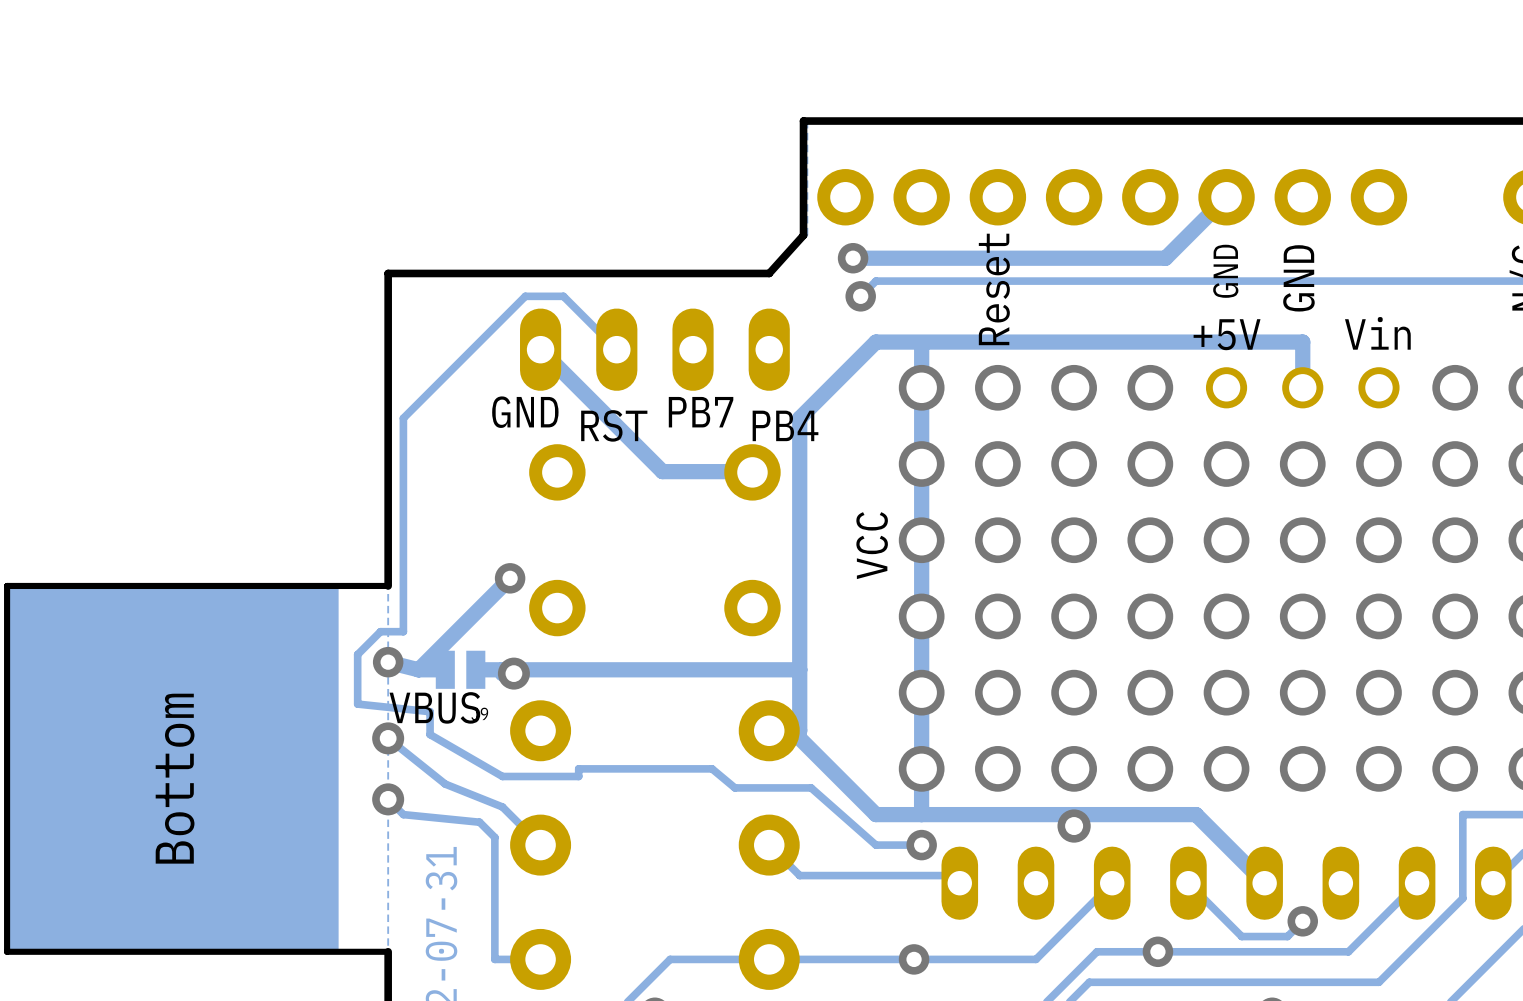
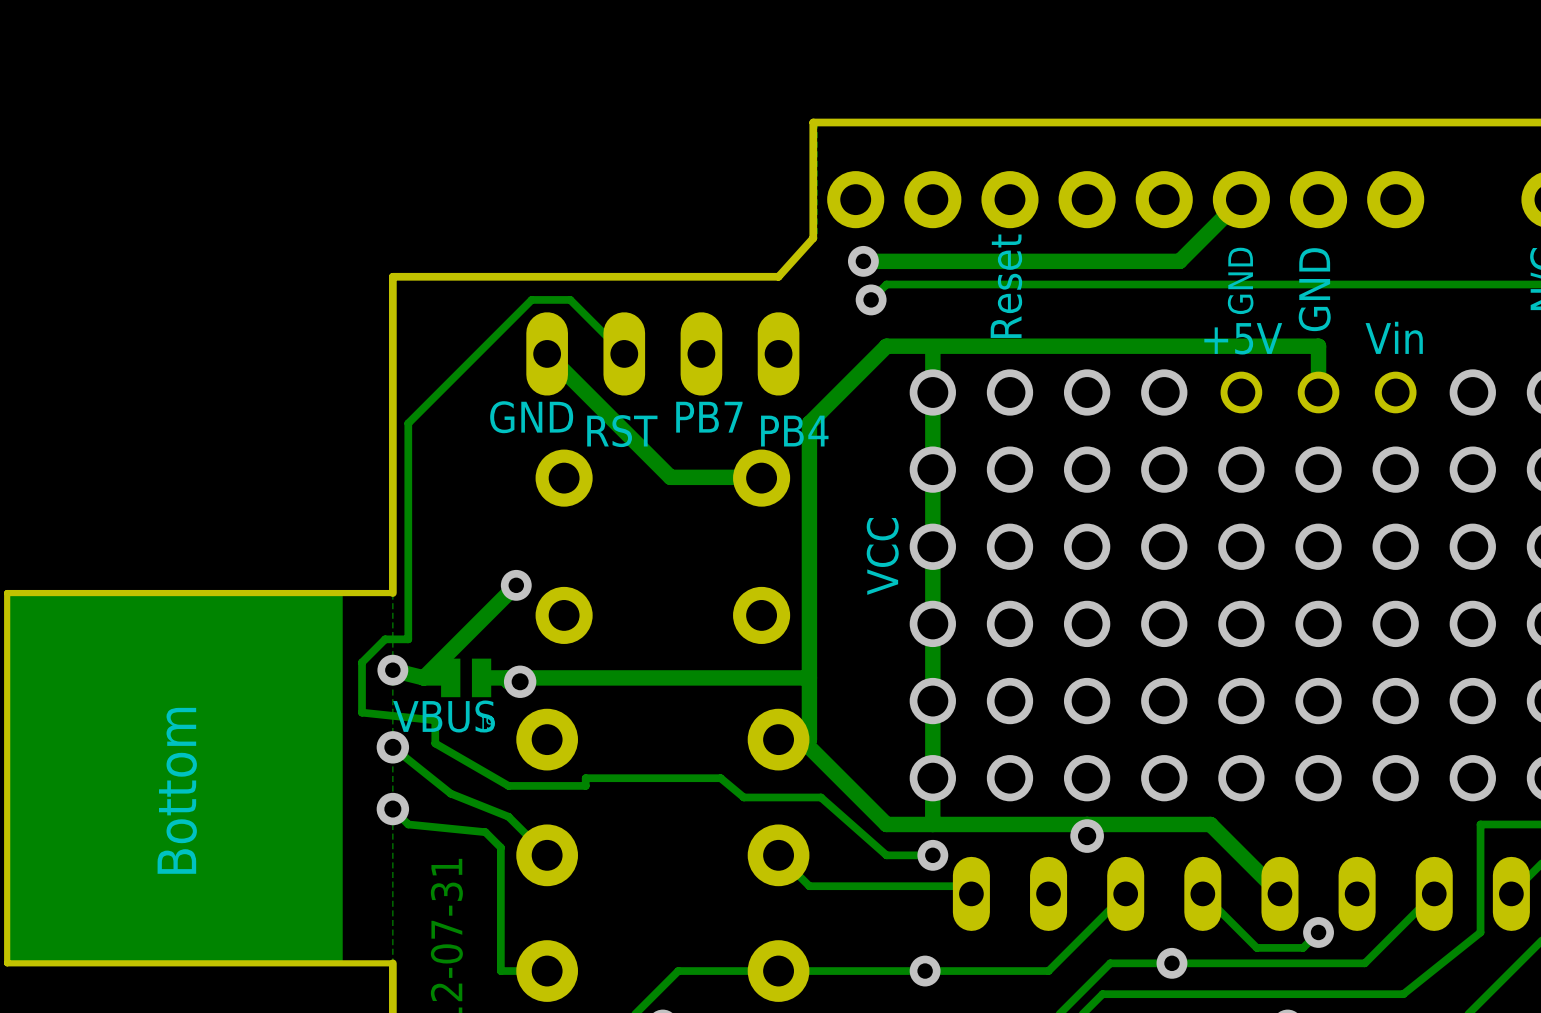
track: (1462, 898) (1378, 982) -> (1480, 909) (1480, 932) (1403, 994) (1395, 994)

